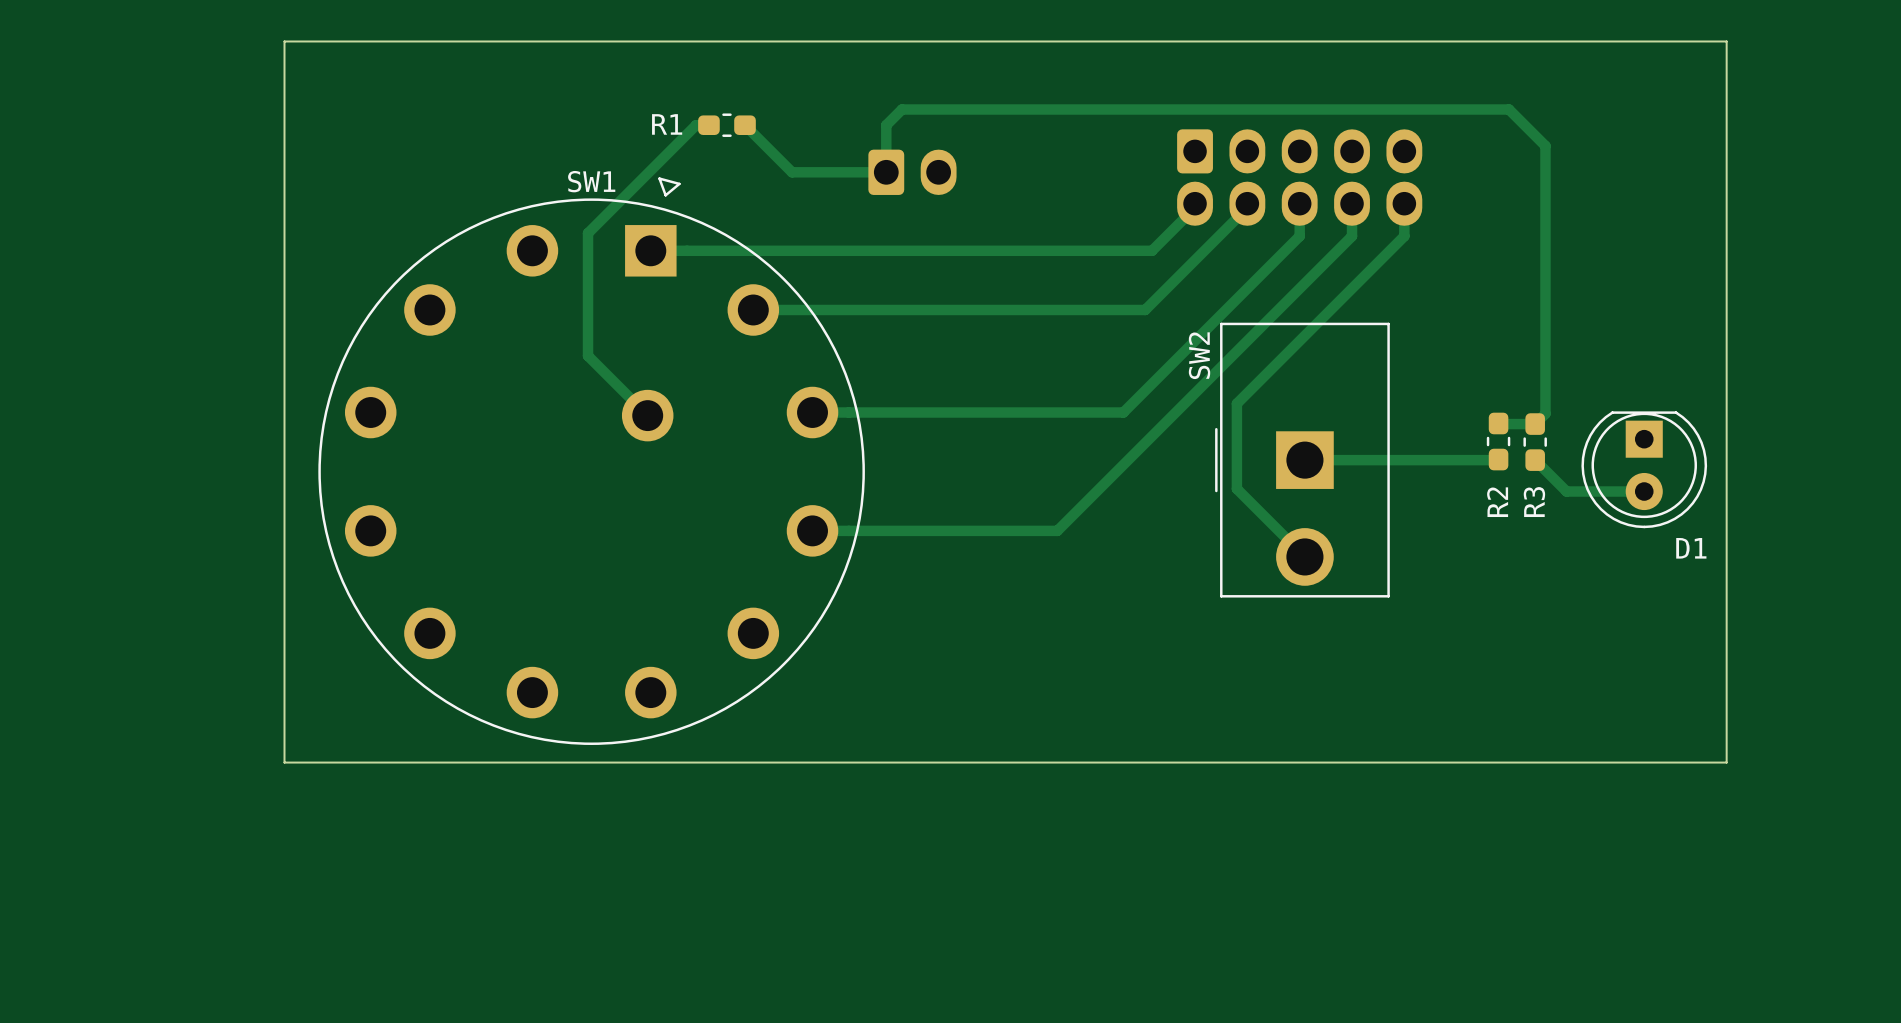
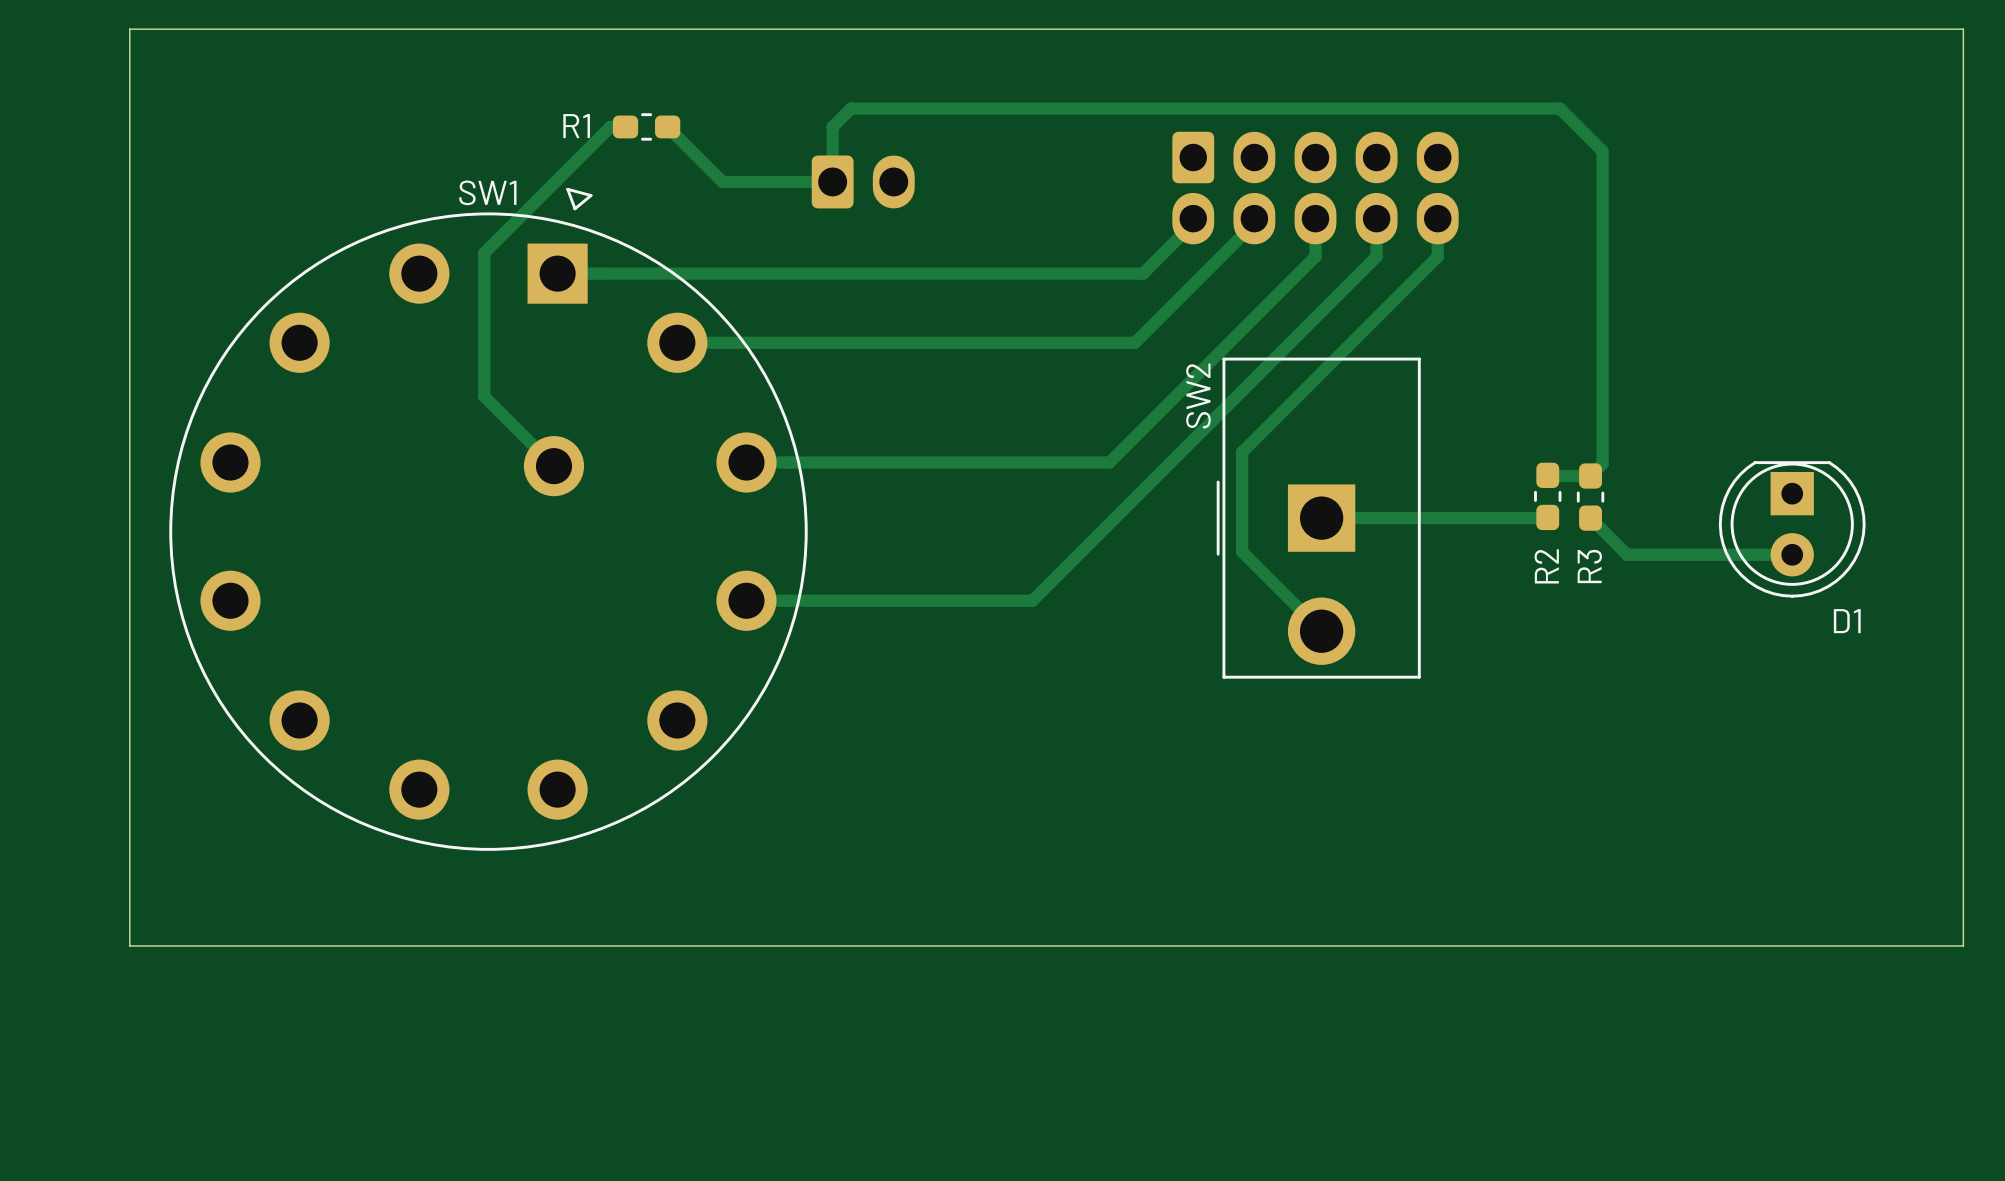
board edge: (1726, 41) (1726, 762) (284, 762) -> (1814, 29) (1963, 29) (1963, 945) (129, 945) (129, 871)
D1 position: (1644, 469) -> (1792, 529)
track: none -> (1717, 554) (1792, 554)

